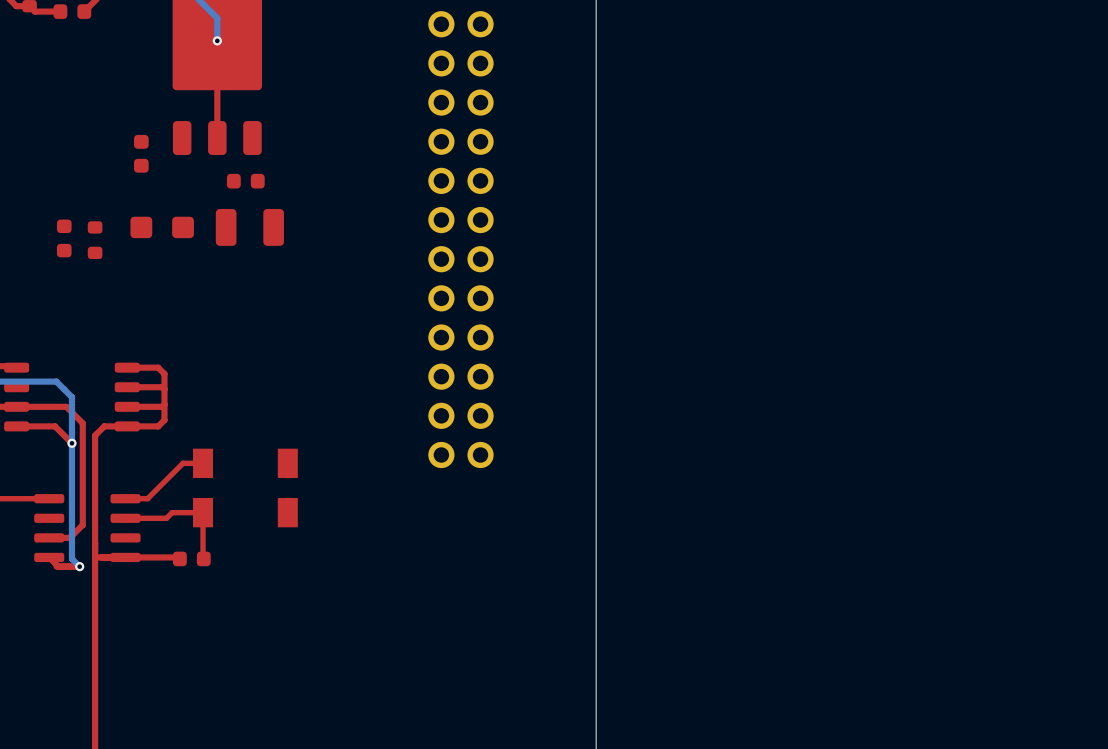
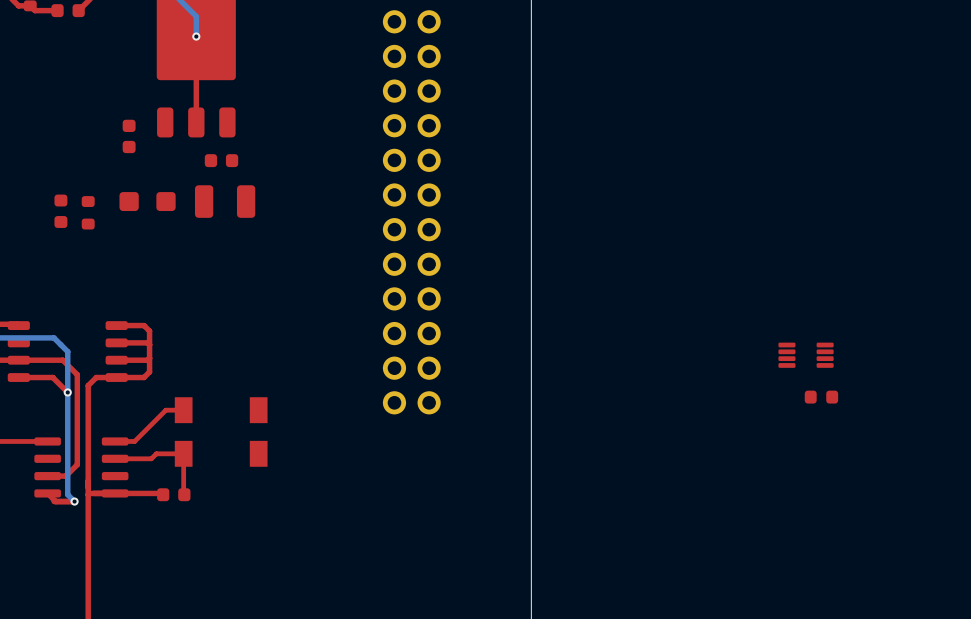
part: none -> (806, 355)
part: none -> (821, 397)

